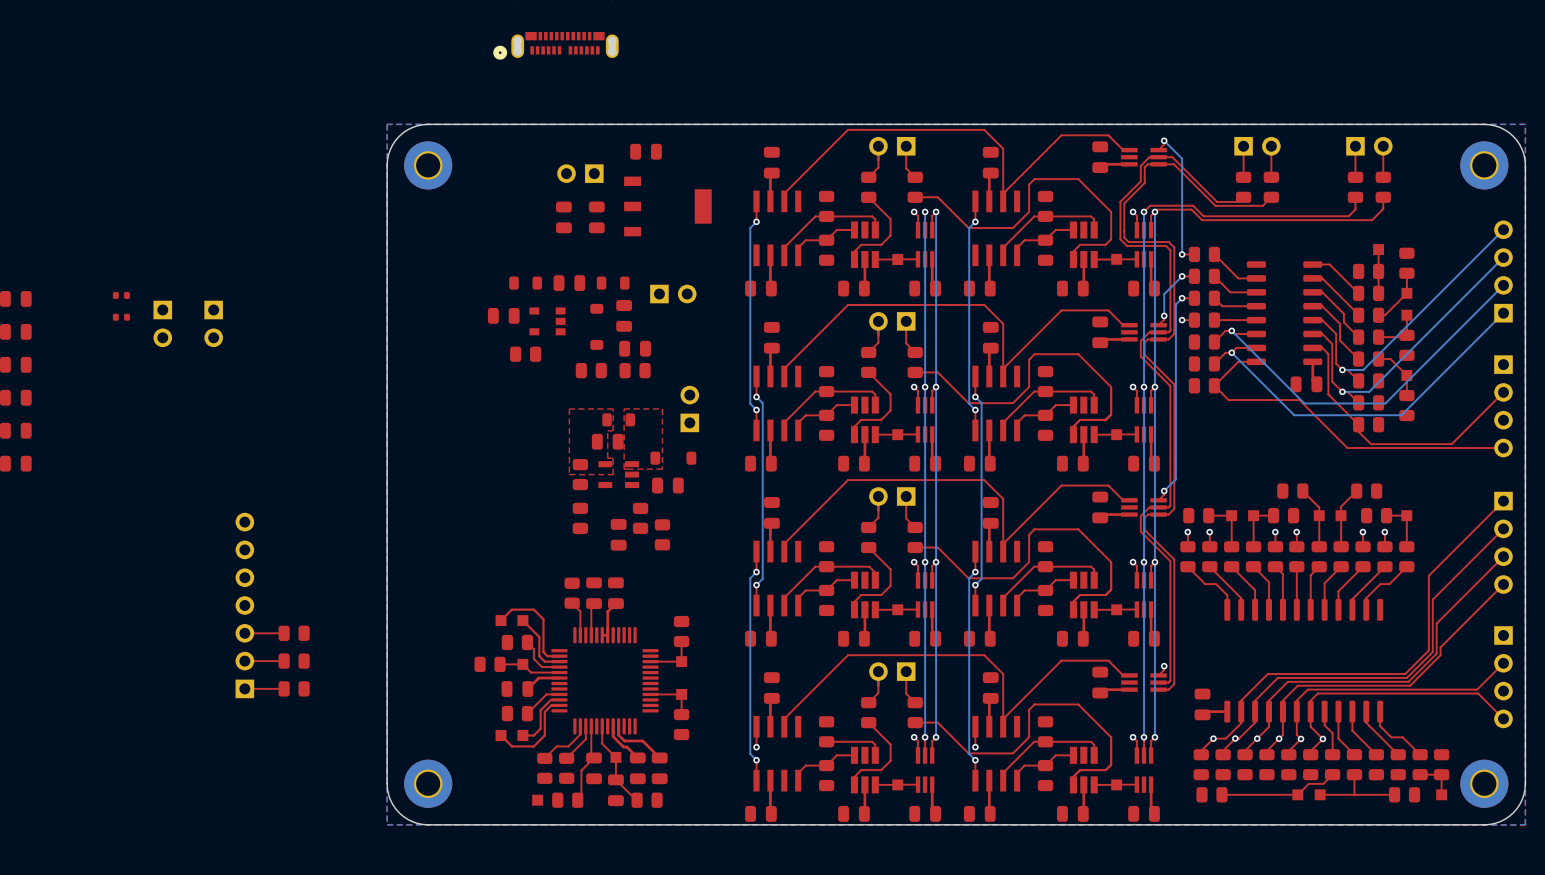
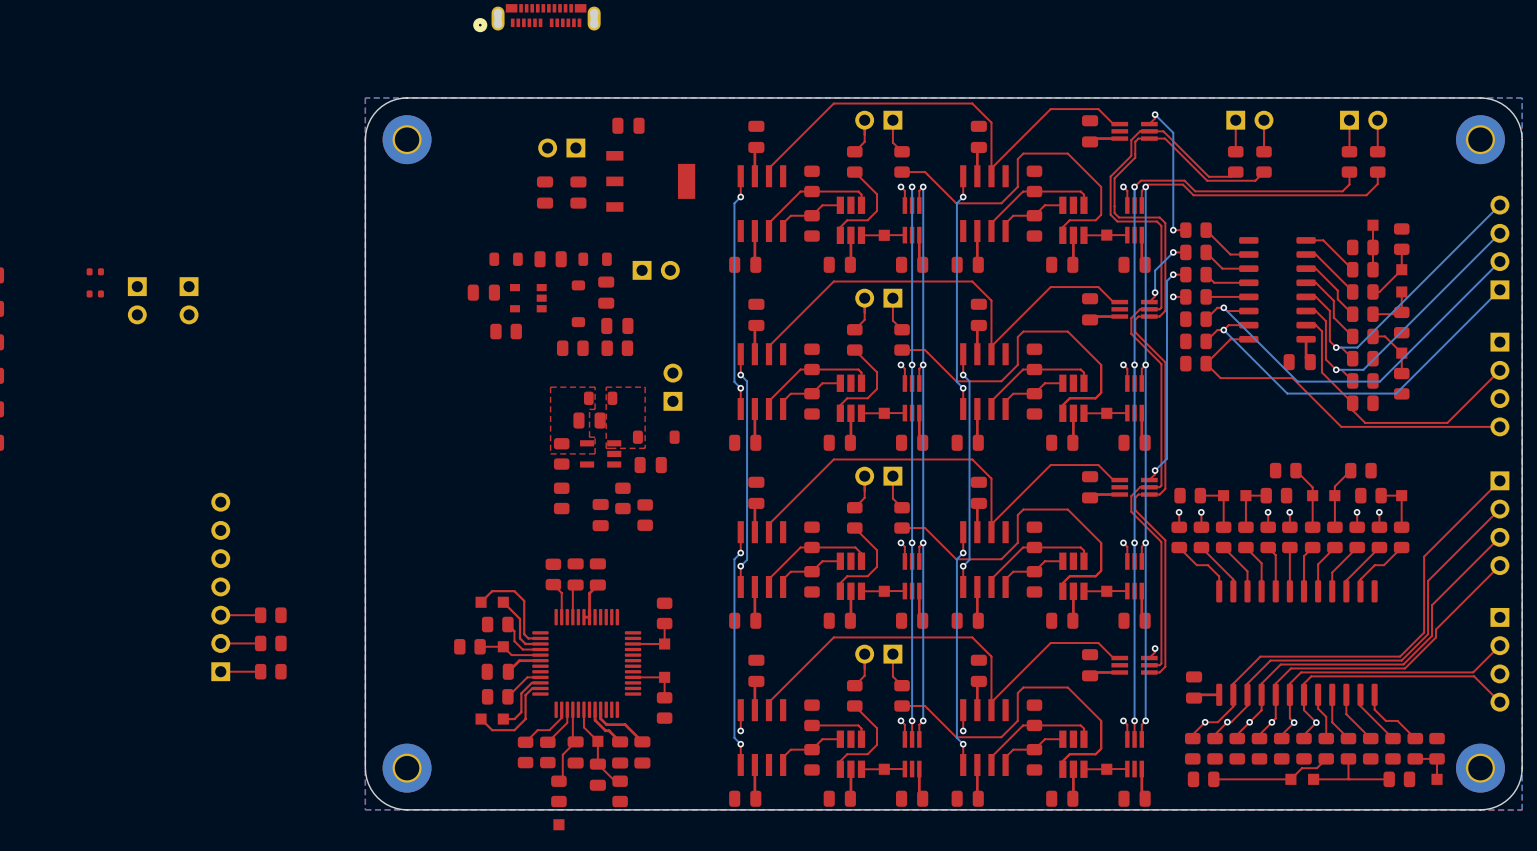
part position: (537, 800) -> (558, 824)
part rotation: 0° (567, 800) -> 90° clockwise (558, 791)
part rotation: 0° (647, 800) -> 90° clockwise (620, 791)

